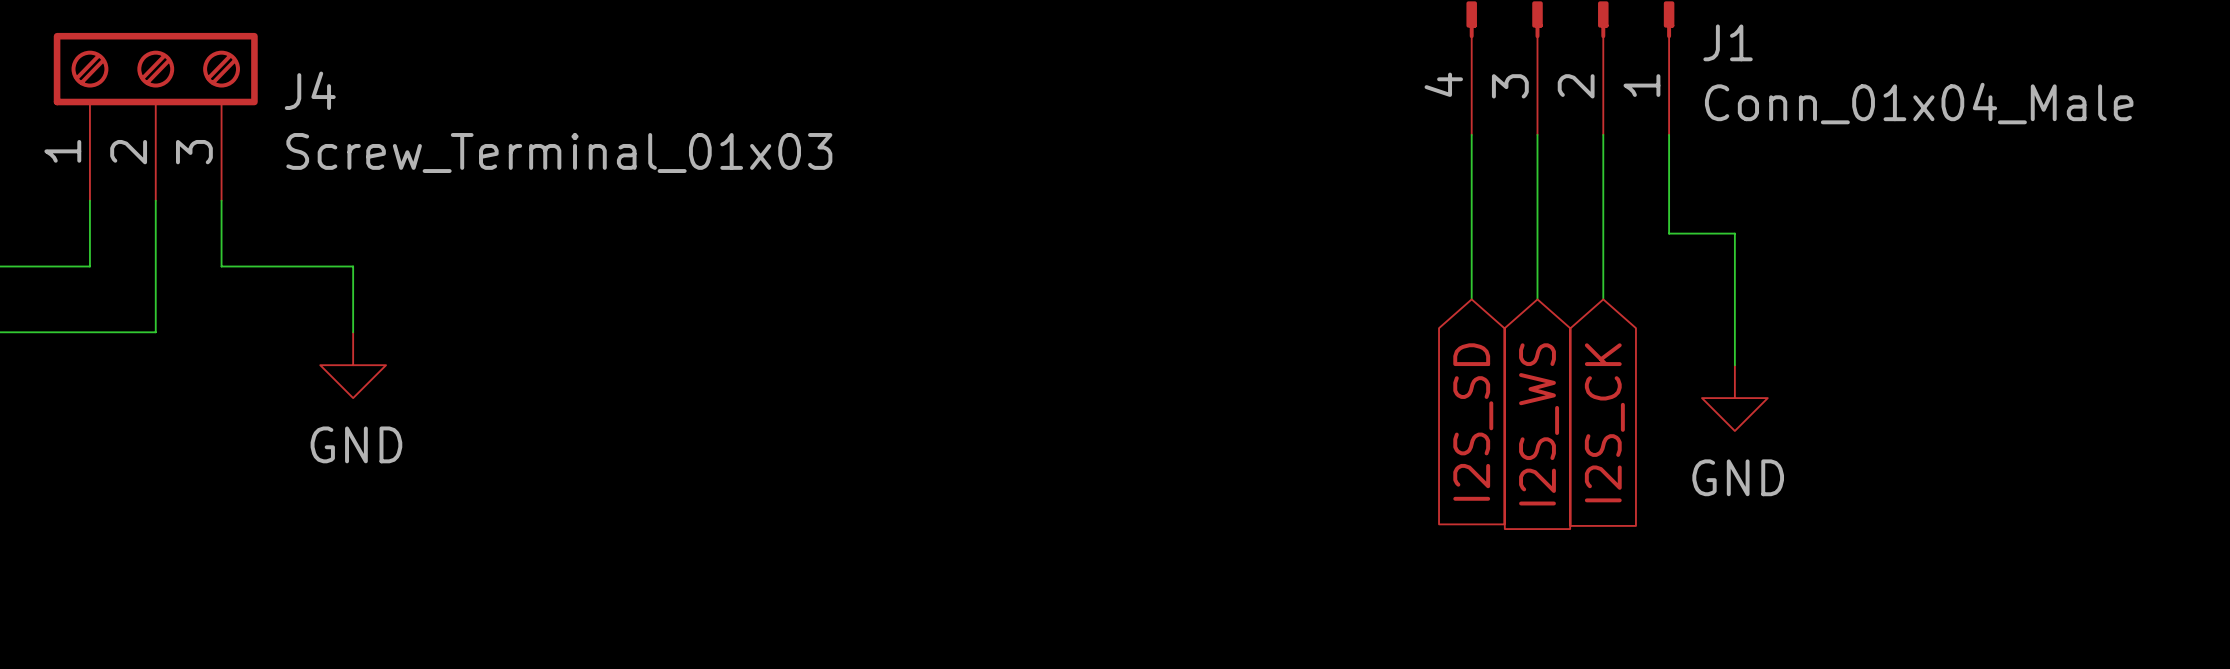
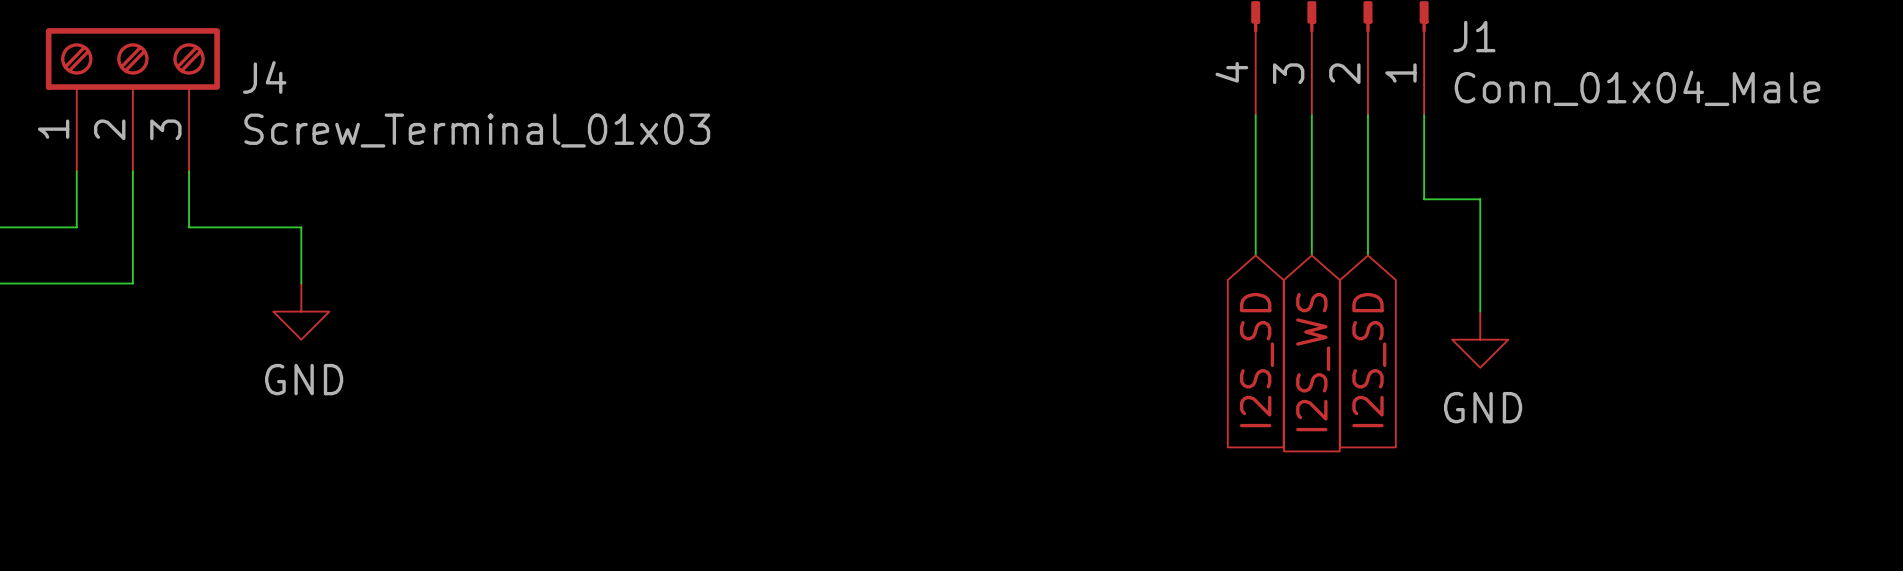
global label: I2S_CK (1604, 422) -> I2S_SD (1369, 360)

